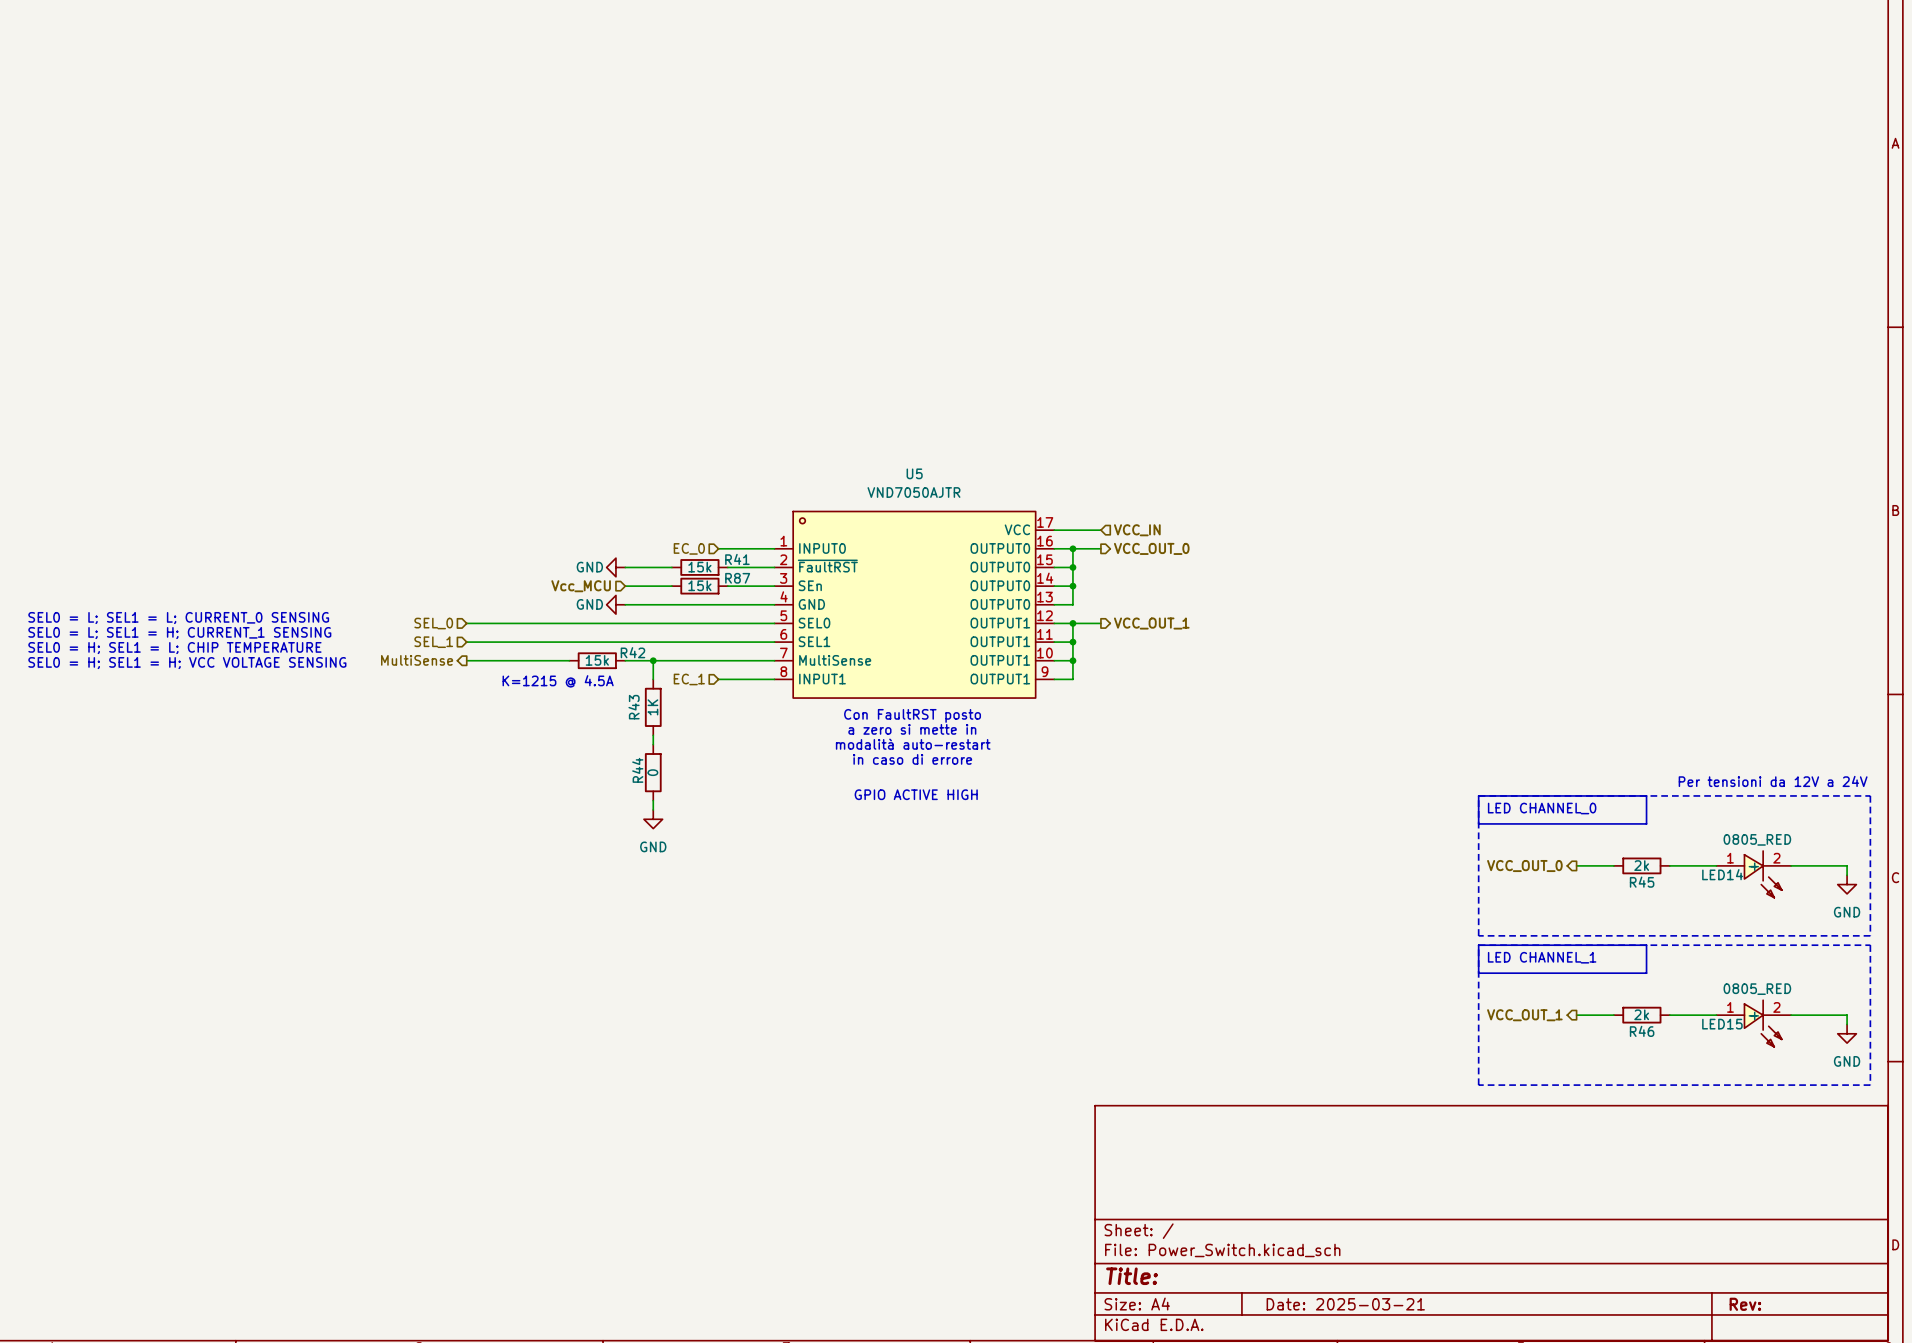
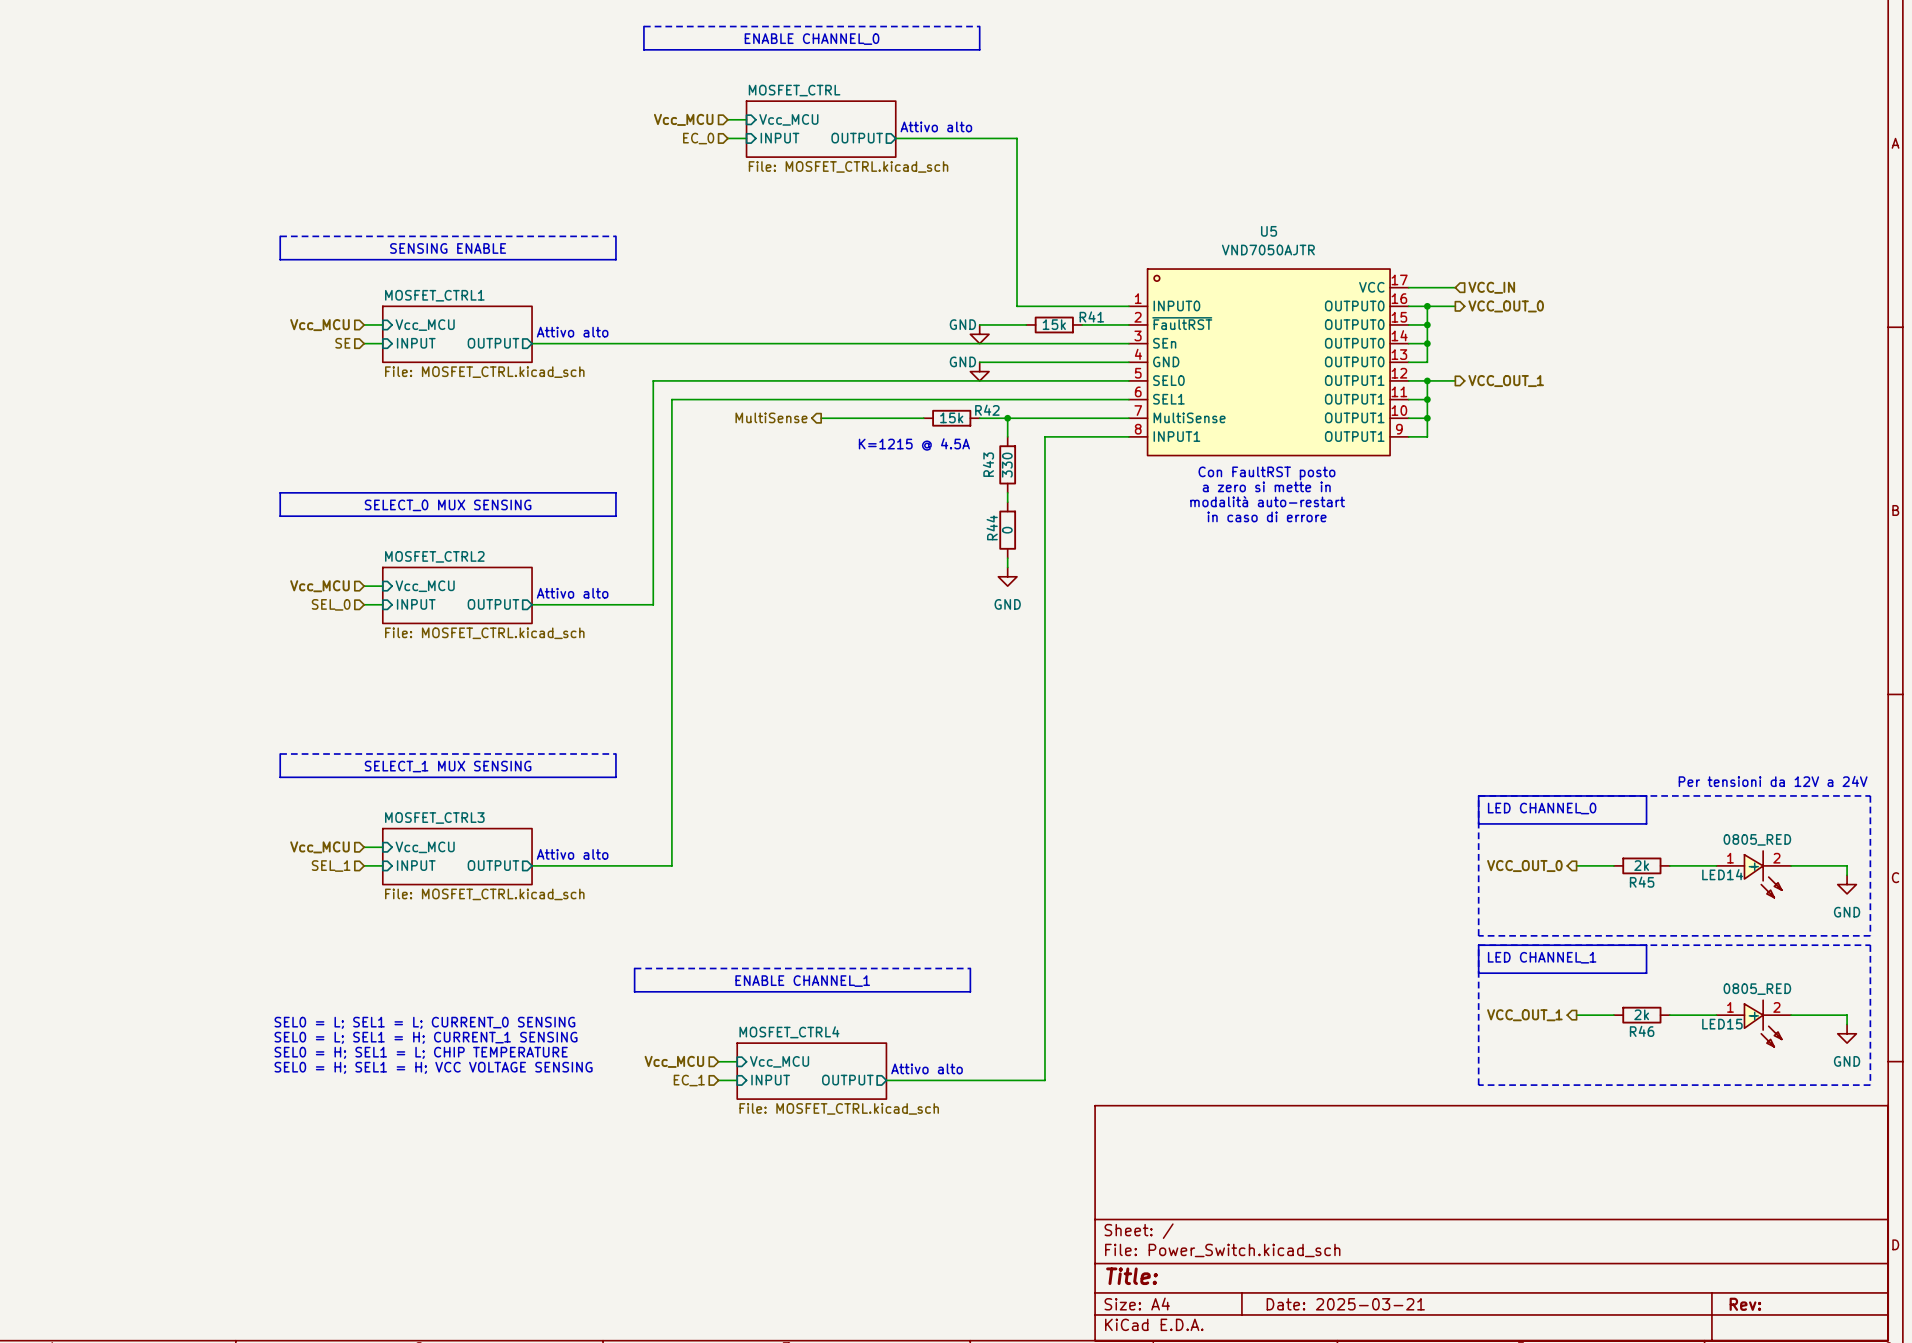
line: none -> (643, 26) (643, 49) (979, 49) (979, 26) (643, 26)
text: none -> ENABLE CHANNEL_0 (812, 39)
hierarchical label: none -> Vcc_MCU (683, 119)
wire: none -> (727, 119) (746, 119)
sheet pin: none -> Vcc_MCU (788, 119)
text: none -> Attivo alto (936, 126)
sheet MOSFET_CTRL: none -> File: MOSFET_CTRL.kicad_sch (821, 129)
hierarchical label: none -> EC_0 (698, 138)
wire: none -> (727, 138) (746, 138)
sheet pin: none -> INPUT (779, 138)
sheet pin: none -> OUTPUT (857, 138)
wire: none -> (895, 138) (1017, 138) (1017, 306) (1128, 306)
line: none -> (280, 236) (280, 259) (615, 259) (615, 236) (280, 236)
text: none -> SENSING ENABLE (448, 248)
wire: none -> (1408, 287) (1455, 287)
hierarchical label: none -> VCC_IN (1491, 287)
wire: none -> (1408, 306) (1455, 306)
wire: none -> (1427, 306) (1427, 362) (1408, 362)
junction: none -> (1427, 306)
hierarchical label: none -> VCC_OUT_0 (1506, 306)
wire: none -> (364, 324) (382, 324)
wire: none -> (979, 324) (1026, 324)
wire: none -> (1082, 324) (1128, 324)
wire: none -> (1408, 324) (1427, 324)
junction: none -> (1427, 324)
hierarchical label: none -> Vcc_MCU (319, 325)
sheet pin: none -> Vcc_MCU (425, 325)
text: none -> Attivo alto (572, 332)
sheet MOSFET_CTRL1: none -> File: MOSFET_CTRL.kicad_sch (457, 334)
power symbol: none -> GND (979, 334)
hierarchical label: none -> SE (342, 343)
wire: none -> (364, 343) (382, 343)
sheet pin: none -> INPUT (416, 343)
sheet pin: none -> OUTPUT (493, 343)
wire: none -> (532, 343) (1128, 343)
wire: none -> (1408, 343) (1427, 343)
junction: none -> (1427, 343)
wire: none -> (979, 362) (1128, 362)
power symbol: none -> GND (979, 371)
wire: none -> (1408, 380) (1455, 380)
wire: none -> (1427, 380) (1427, 436) (1408, 436)
junction: none -> (1427, 380)
hierarchical label: none -> VCC_OUT_1 (1506, 381)
wire: none -> (1128, 399) (671, 399) (671, 865) (532, 865)
wire: none -> (1408, 399) (1427, 399)
junction: none -> (1427, 399)
hierarchical label: none -> MultiSense (771, 417)
wire: none -> (821, 418) (923, 418)
wire: none -> (979, 418) (1128, 418)
wire: none -> (1007, 418) (1007, 436)
junction: none -> (1007, 418)
wire: none -> (1408, 418) (1427, 418)
junction: none -> (1427, 418)
wire: none -> (1128, 436) (1044, 436) (1044, 1080) (886, 1080)
text: none -> K=1215 @ 4.5A (914, 444)
text: none -> Con FaultRST posto (1266, 473)
text: none -> a zero si mette in (1266, 486)
line: none -> (280, 492) (280, 516) (615, 516) (615, 492) (280, 492)
wire: none -> (1007, 492) (1007, 502)
text: none -> modalità auto-restart (1267, 501)
text: none -> SELECT_0 MUX SENSING (448, 505)
text: none -> in caso di errore (1266, 516)
wire: (1054, 530) (1100, 530) -> none
hierarchical label: VCC_IN (1137, 530) -> none
hierarchical label: EC_0 (689, 548) -> none
wire: (718, 548) (774, 548) -> none
wire: (1054, 548) (1100, 548) -> none
wire: (1072, 548) (1072, 604) (1054, 604) -> none
junction: (1072, 548) -> none
hierarchical label: VCC_OUT_0 (1151, 548) -> none
power symbol: GND (615, 567) -> none
wire: (625, 567) (671, 567) -> none
R41 position: (699, 567) -> (1054, 324)
wire: (727, 567) (774, 567) -> none
wire: (1054, 567) (1072, 567) -> none
junction: (1072, 567) -> none
power symbol: none -> GND (1007, 576)
hierarchical label: none -> Vcc_MCU (319, 586)
wire: none -> (364, 586) (382, 586)
sheet pin: none -> Vcc_MCU (425, 586)
hierarchical label: Vcc_MCU (581, 586) -> none
wire: (625, 586) (671, 586) -> none
R87: 15k (699, 586) -> none
wire: (727, 586) (774, 586) -> none
wire: (1054, 586) (1072, 586) -> none
junction: (1072, 586) -> none
text: none -> Attivo alto (572, 593)
sheet MOSFET_CTRL2: none -> File: MOSFET_CTRL.kicad_sch (457, 595)
wire: none -> (364, 604) (382, 604)
sheet pin: none -> INPUT (416, 604)
sheet pin: none -> OUTPUT (493, 604)
wire: none -> (532, 604) (625, 604)
power symbol: GND (615, 604) -> none
wire: (653, 604) (774, 604) -> (653, 604) (653, 380) (1128, 380)
U5 position: (914, 604) -> (1268, 362)
text: SEL0 = L; SEL1 = L; CURRENT_0 SENSING (178, 618) -> none
hierarchical label position: SEL_0 (433, 623) -> SEL_0 (331, 604)
wire: (466, 623) (774, 623) -> none
wire: (1054, 623) (1100, 623) -> none
wire: (1072, 623) (1072, 679) (1054, 679) -> none
junction: (1072, 623) -> none
hierarchical label: VCC_OUT_1 (1151, 623) -> none
text: SEL0 = L; SEL1 = H; CURRENT_1 SENSING (179, 633) -> none
hierarchical label: SEL_1 (433, 642) -> none
wire: (466, 642) (774, 642) -> none
wire: (1054, 642) (1072, 642) -> none
junction: (1072, 642) -> none
text: SEL0 = H; SEL1 = L; CHIP TEMPERATURE (174, 648) -> none
hierarchical label: MultiSense (417, 660) -> none
wire: (466, 660) (569, 660) -> none
R42 position: (597, 660) -> (951, 418)
wire: (625, 660) (774, 660) -> none
wire: (653, 660) (653, 679) -> none
junction: (653, 660) -> none
wire: (1054, 660) (1072, 660) -> none
junction: (1072, 660) -> none
text: SEL0 = H; SEL1 = H; VCC VOLTAGE SENSING (187, 663) -> none
hierarchical label: EC_1 (689, 679) -> none
wire: (718, 679) (774, 679) -> none
text: K=1215 @ 4.5A (558, 681) -> none
R43 value: 1K (652, 707) -> 330 (1007, 465)
R43 position: (653, 707) -> (1007, 464)
text: Con FaultRST posto (912, 715) -> none
text: a zero si mette in (912, 729) -> none
wire: (653, 735) (653, 744) -> none
text: modalità auto-restart (913, 744) -> none
line: none -> (280, 754) (280, 777) (615, 777) (615, 754) (280, 754)
text: in caso di errore (912, 759) -> none
text: none -> SELECT_1 MUX SENSING (448, 766)
R44 position: (653, 772) -> (1007, 530)
text: GPIO ACTIVE HIGH (916, 794) -> none
wire: (653, 800) (653, 809) -> none
power symbol: GND (653, 819) -> none
hierarchical label: none -> Vcc_MCU (319, 847)
wire: none -> (364, 847) (382, 847)
sheet pin: none -> Vcc_MCU (425, 847)
text: none -> Attivo alto (572, 854)
sheet MOSFET_CTRL3: none -> File: MOSFET_CTRL.kicad_sch (457, 856)
wire: none -> (364, 865) (382, 865)
sheet pin: none -> INPUT (416, 865)
sheet pin: none -> OUTPUT (493, 865)
hierarchical label: none -> SEL_1 (331, 866)
line: none -> (634, 968) (634, 991) (970, 991) (970, 968) (634, 968)
text: none -> ENABLE CHANNEL_1 (802, 981)
text: none -> SEL0 = L; SEL1 = L; CURRENT_0 SENSING (424, 1022)
text: none -> SEL0 = L; SEL1 = H; CURRENT_1 SENSING (426, 1037)
text: none -> SEL0 = H; SEL1 = L; CHIP TEMPERATURE (421, 1052)
hierarchical label: none -> Vcc_MCU (674, 1061)
wire: none -> (718, 1061) (737, 1061)
sheet pin: none -> Vcc_MCU (779, 1061)
text: none -> SEL0 = H; SEL1 = H; VCC VOLTAGE SENSING (433, 1067)
text: none -> Attivo alto (927, 1068)
sheet MOSFET_CTRL4: none -> File: MOSFET_CTRL.kicad_sch (811, 1071)
hierarchical label: none -> EC_1 (689, 1080)
wire: none -> (718, 1080) (737, 1080)
sheet pin: none -> INPUT (770, 1080)
sheet pin: none -> OUTPUT (847, 1080)

